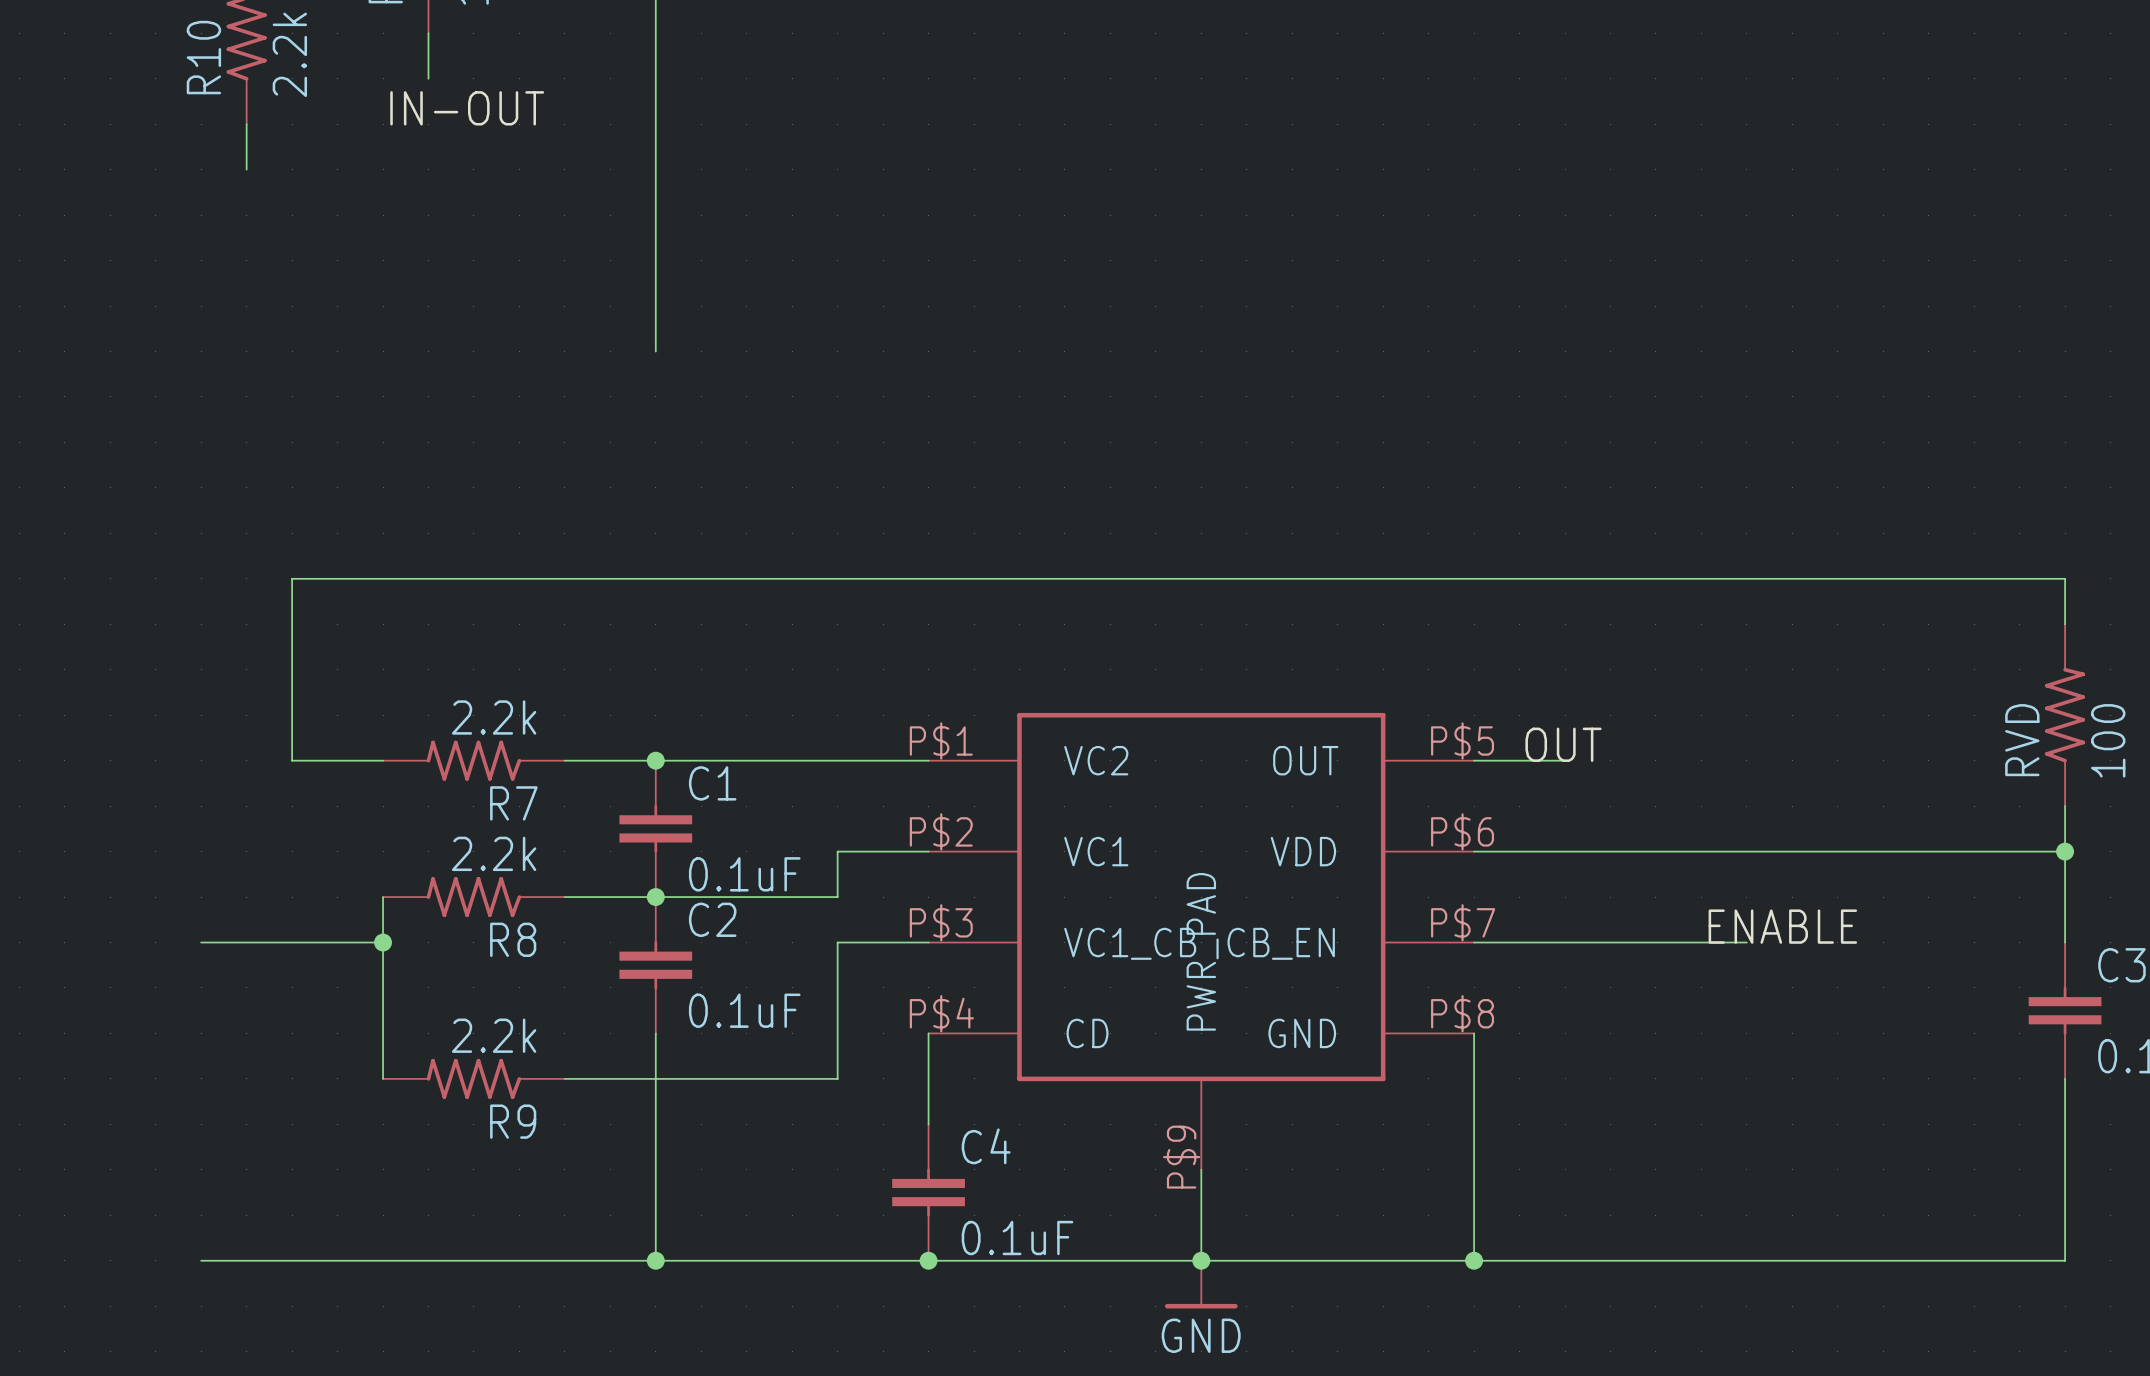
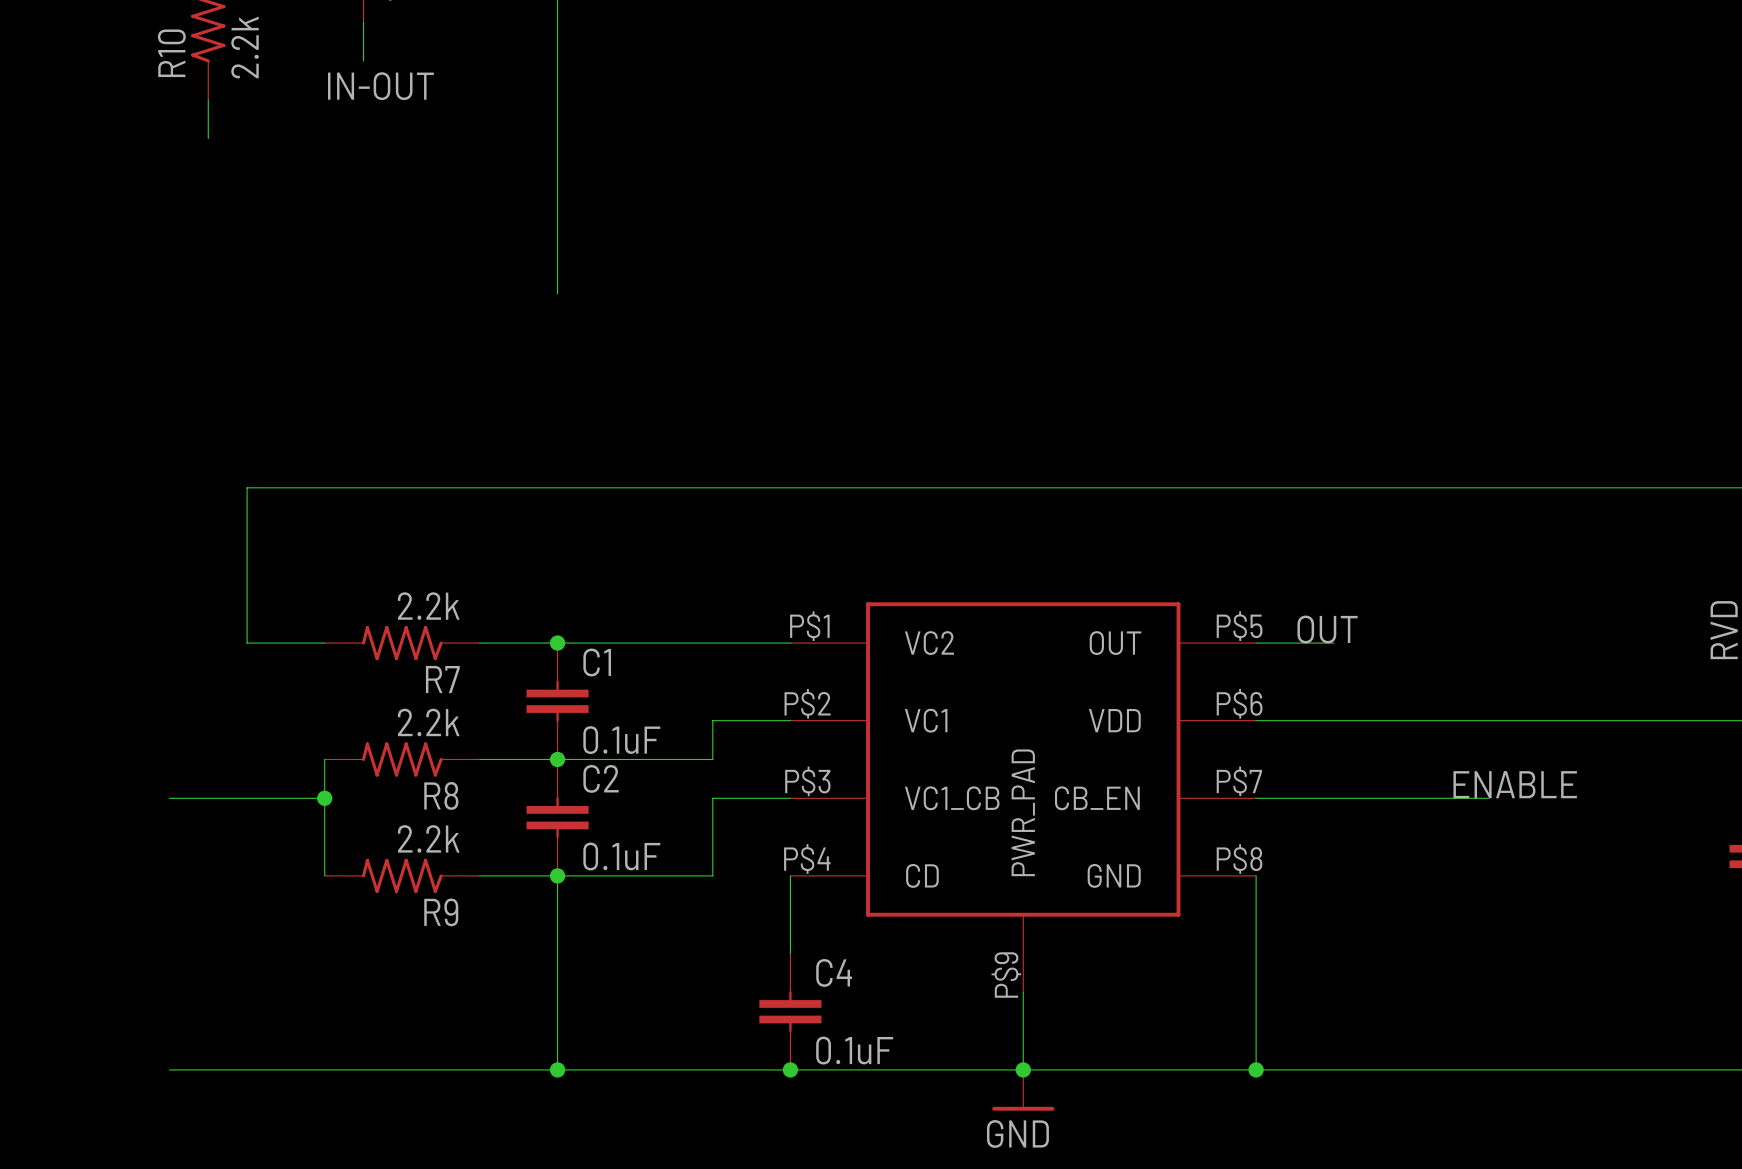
wire: (383, 1033) (383, 1078) -> none
junction: none -> (557, 875)
wire: (837, 1033) (837, 1078) (564, 1078) -> (712, 875) (479, 875)
R9 position: (473, 1078) -> (402, 875)

